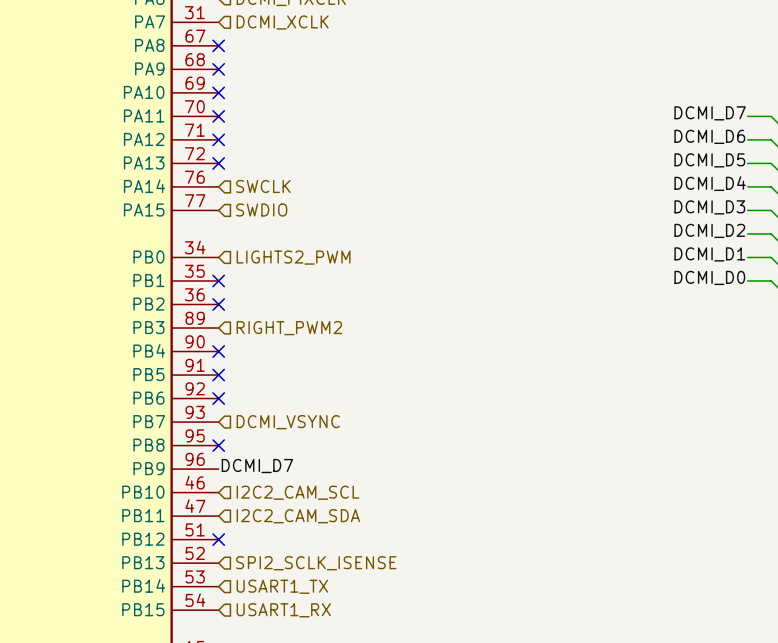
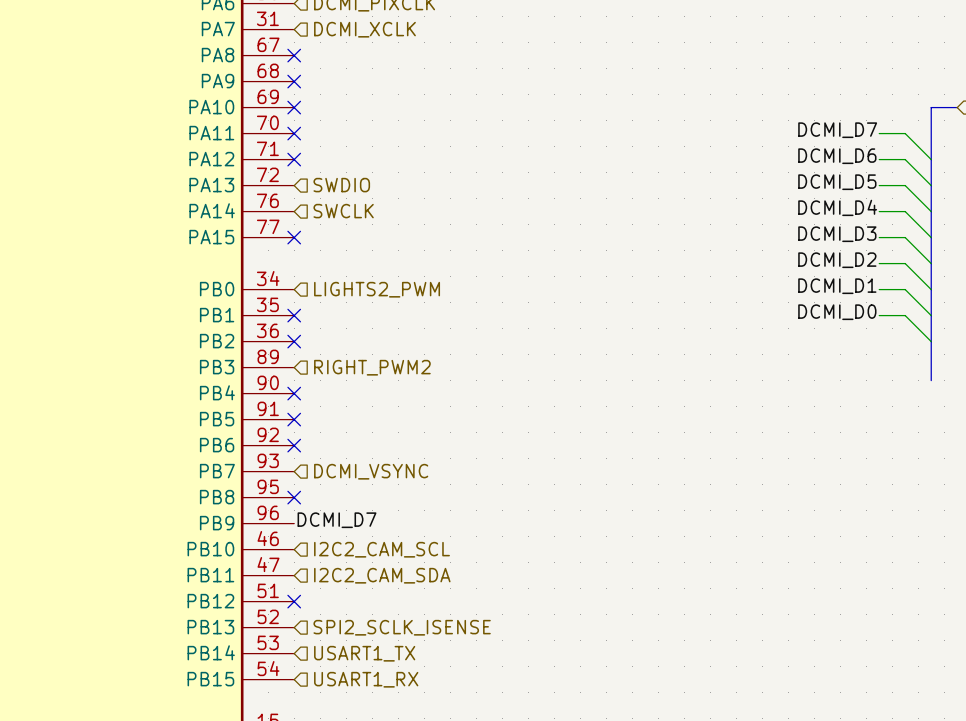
no-connect mark position: (218, 163) -> (294, 237)
hierarchical label position: SWDIO (261, 210) -> SWDIO (341, 185)

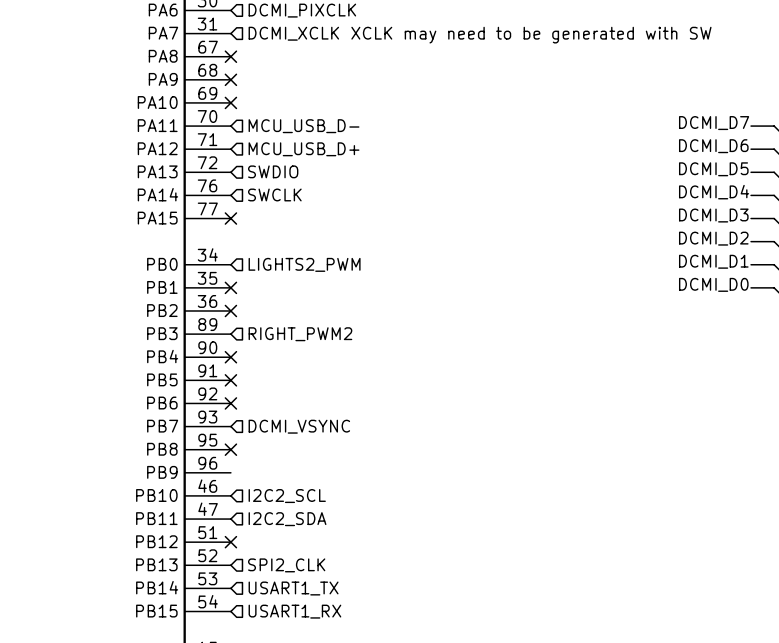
text: none -> XCLK may need to be generated with SW (531, 35)
no-connect mark: (294, 133) -> none
hierarchical label: none -> MCU_USB_D- (304, 126)
no-connect mark: (294, 159) -> none
hierarchical label: none -> MCU_USB_D+ (304, 149)
label: DCMI_D7 (337, 520) -> none
hierarchical label: I2C2_CAM_SCL (382, 549) -> I2C2_SCL (287, 496)
hierarchical label: I2C2_CAM_SDA (382, 575) -> I2C2_SDA (287, 519)
hierarchical label: SPI2_SCLK_ISENSE (402, 627) -> SPI2_CLK (286, 565)

